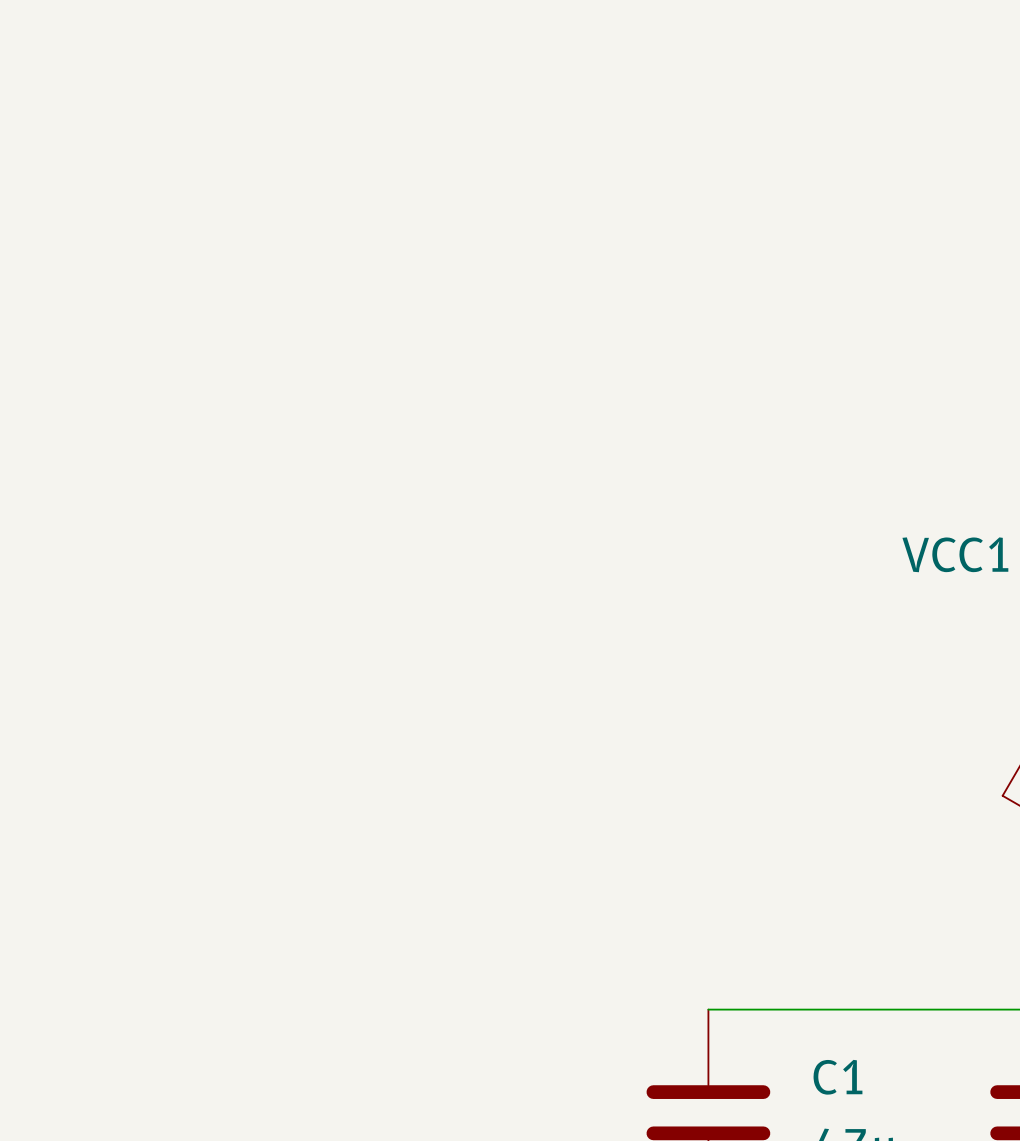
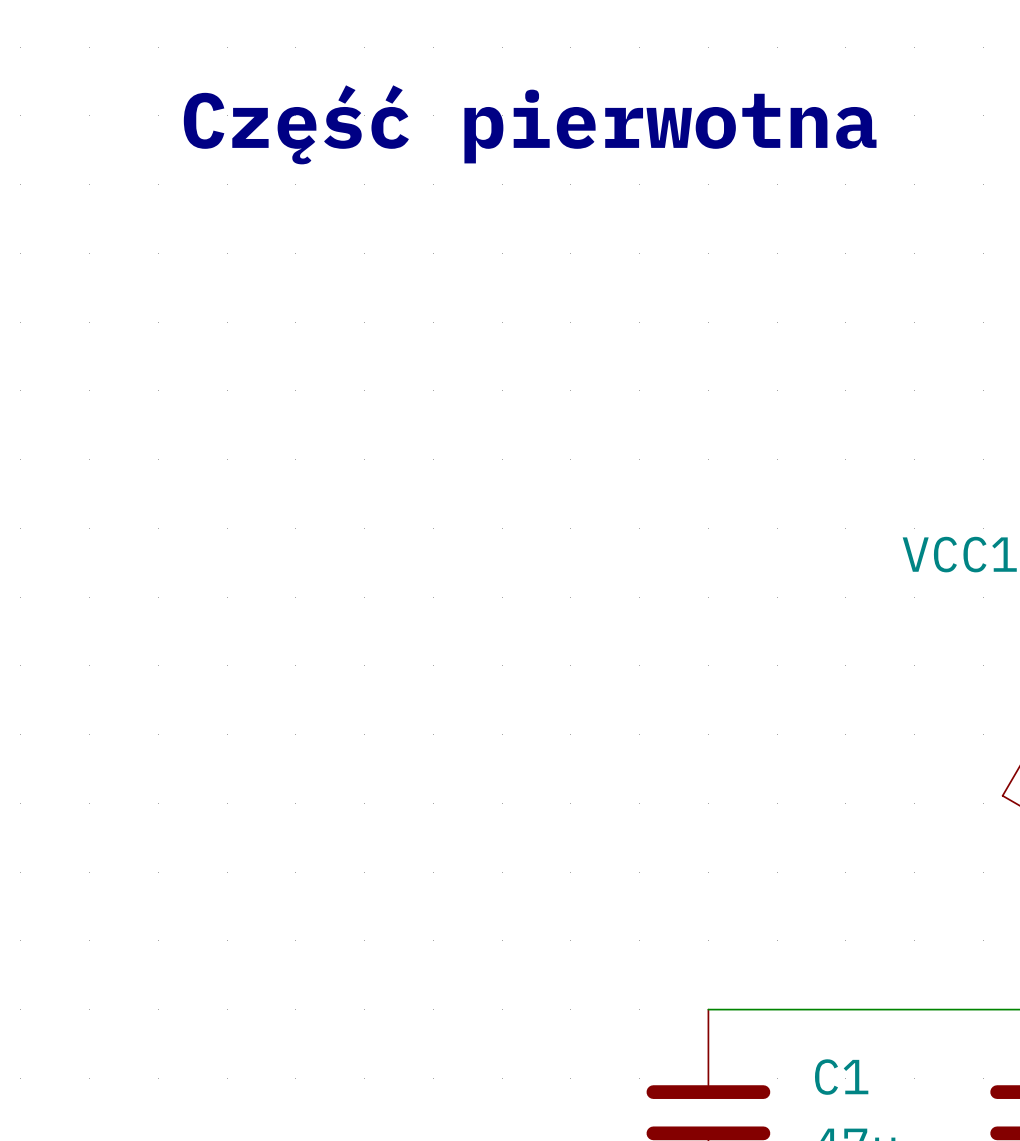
text: none -> Część pierwotna (530, 124)

